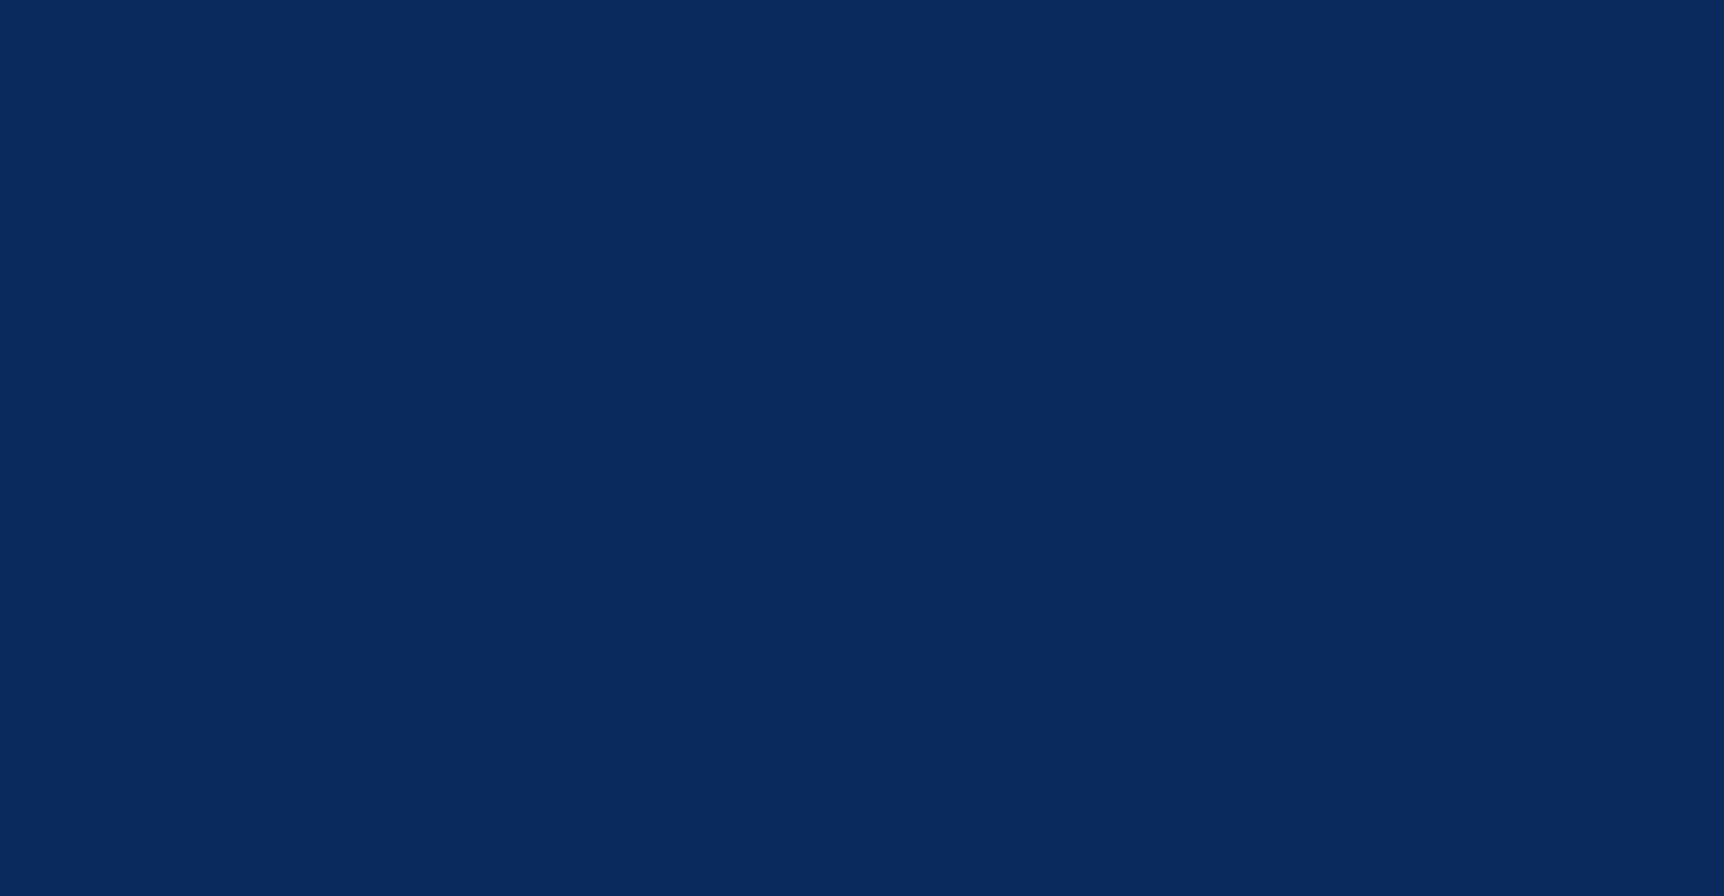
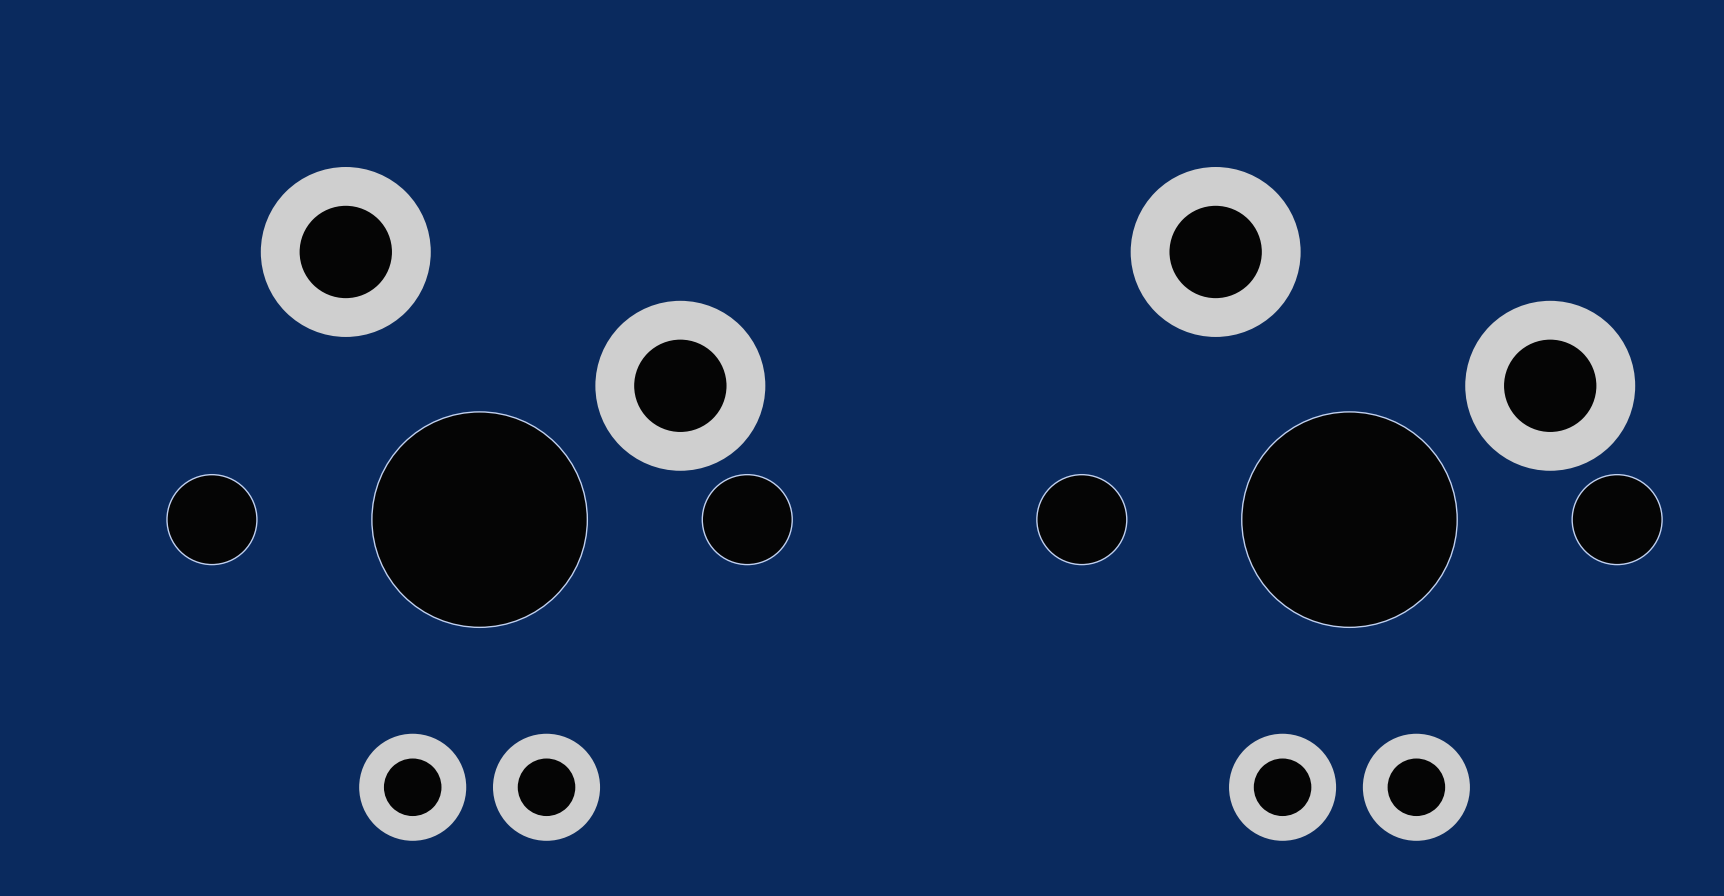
part: none -> (479, 503)
part: none -> (1349, 503)

